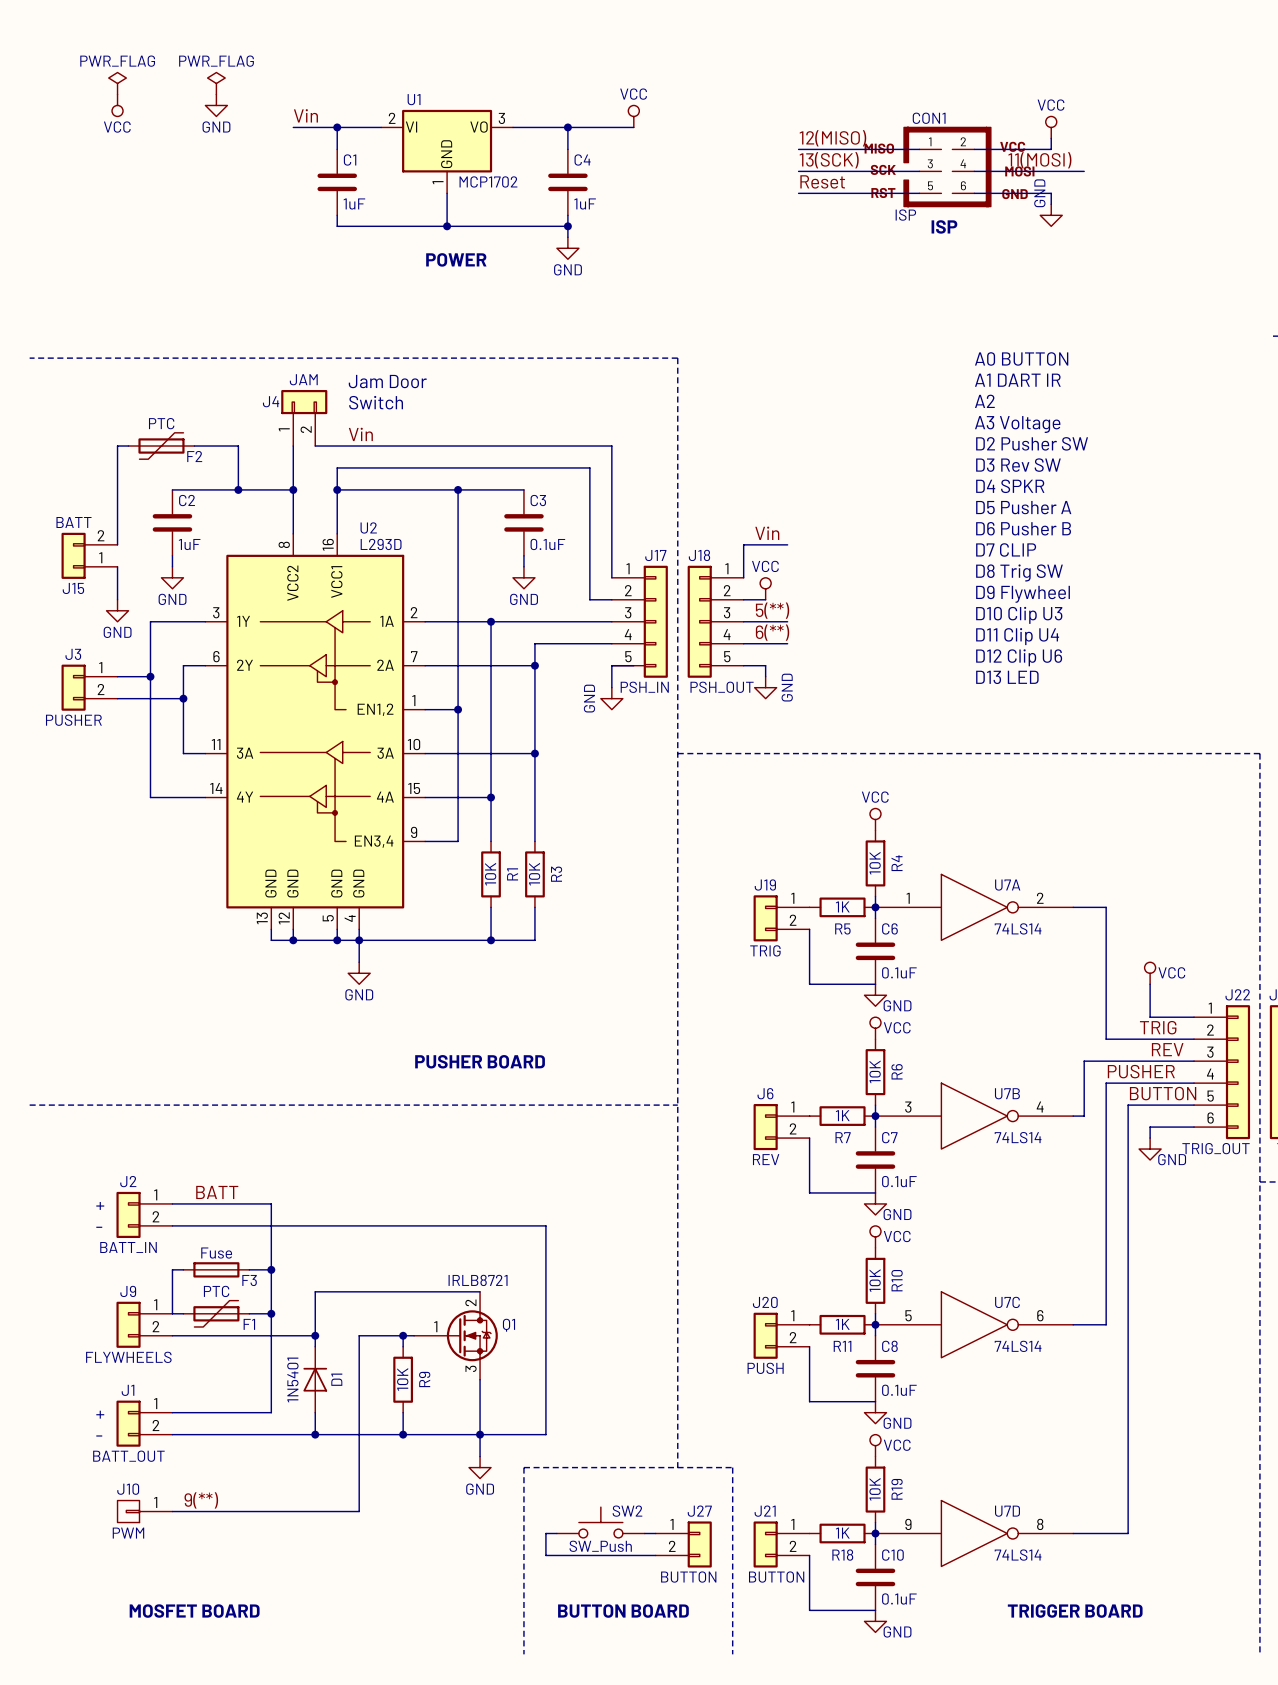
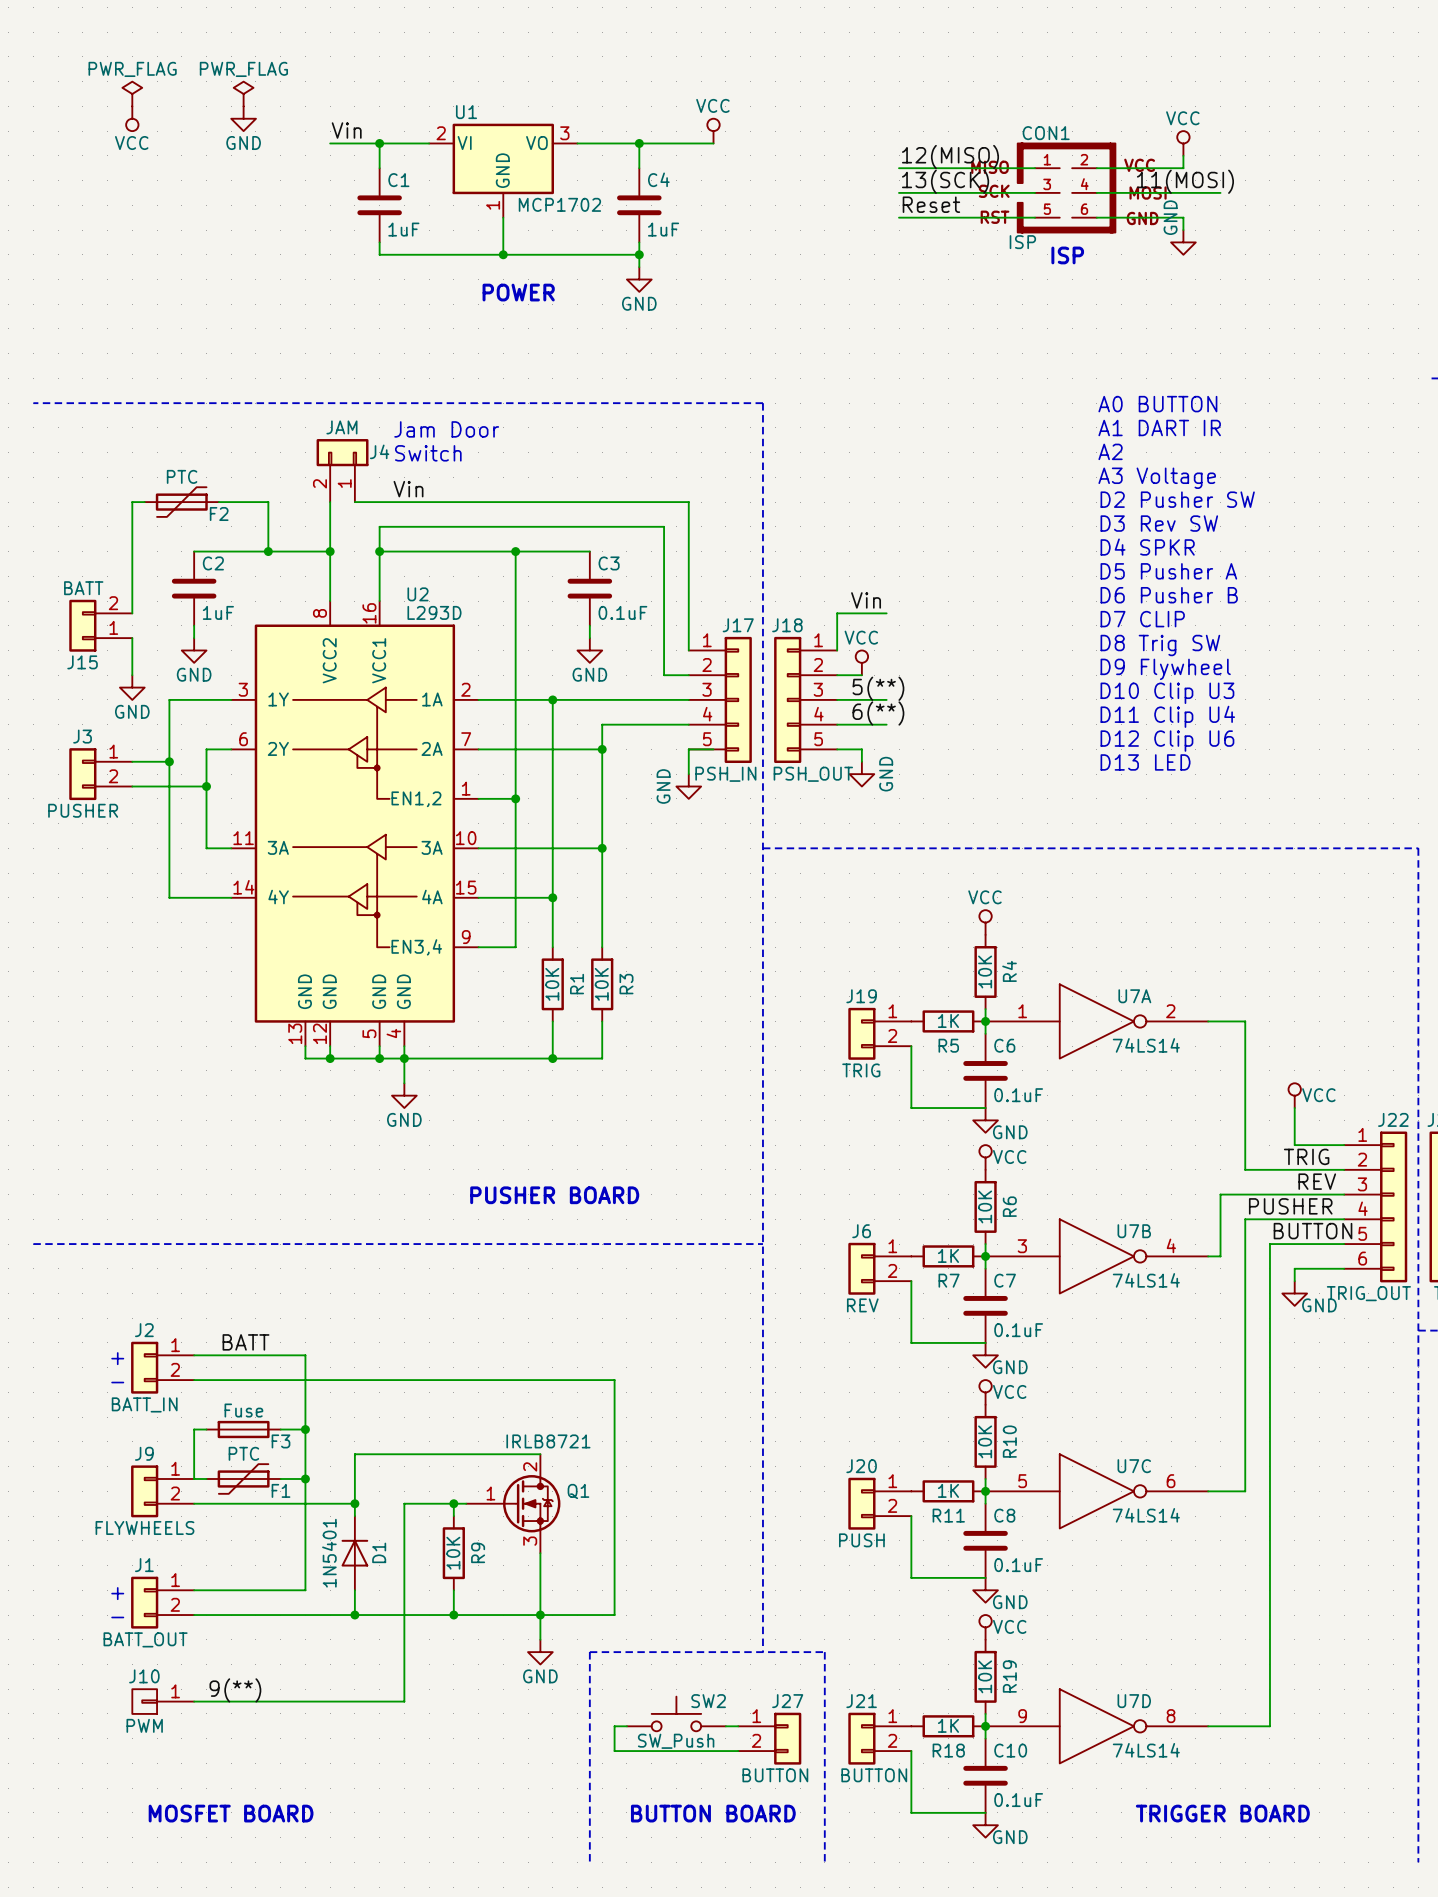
J4 flip: as is (304, 402) -> left-right (342, 452)

